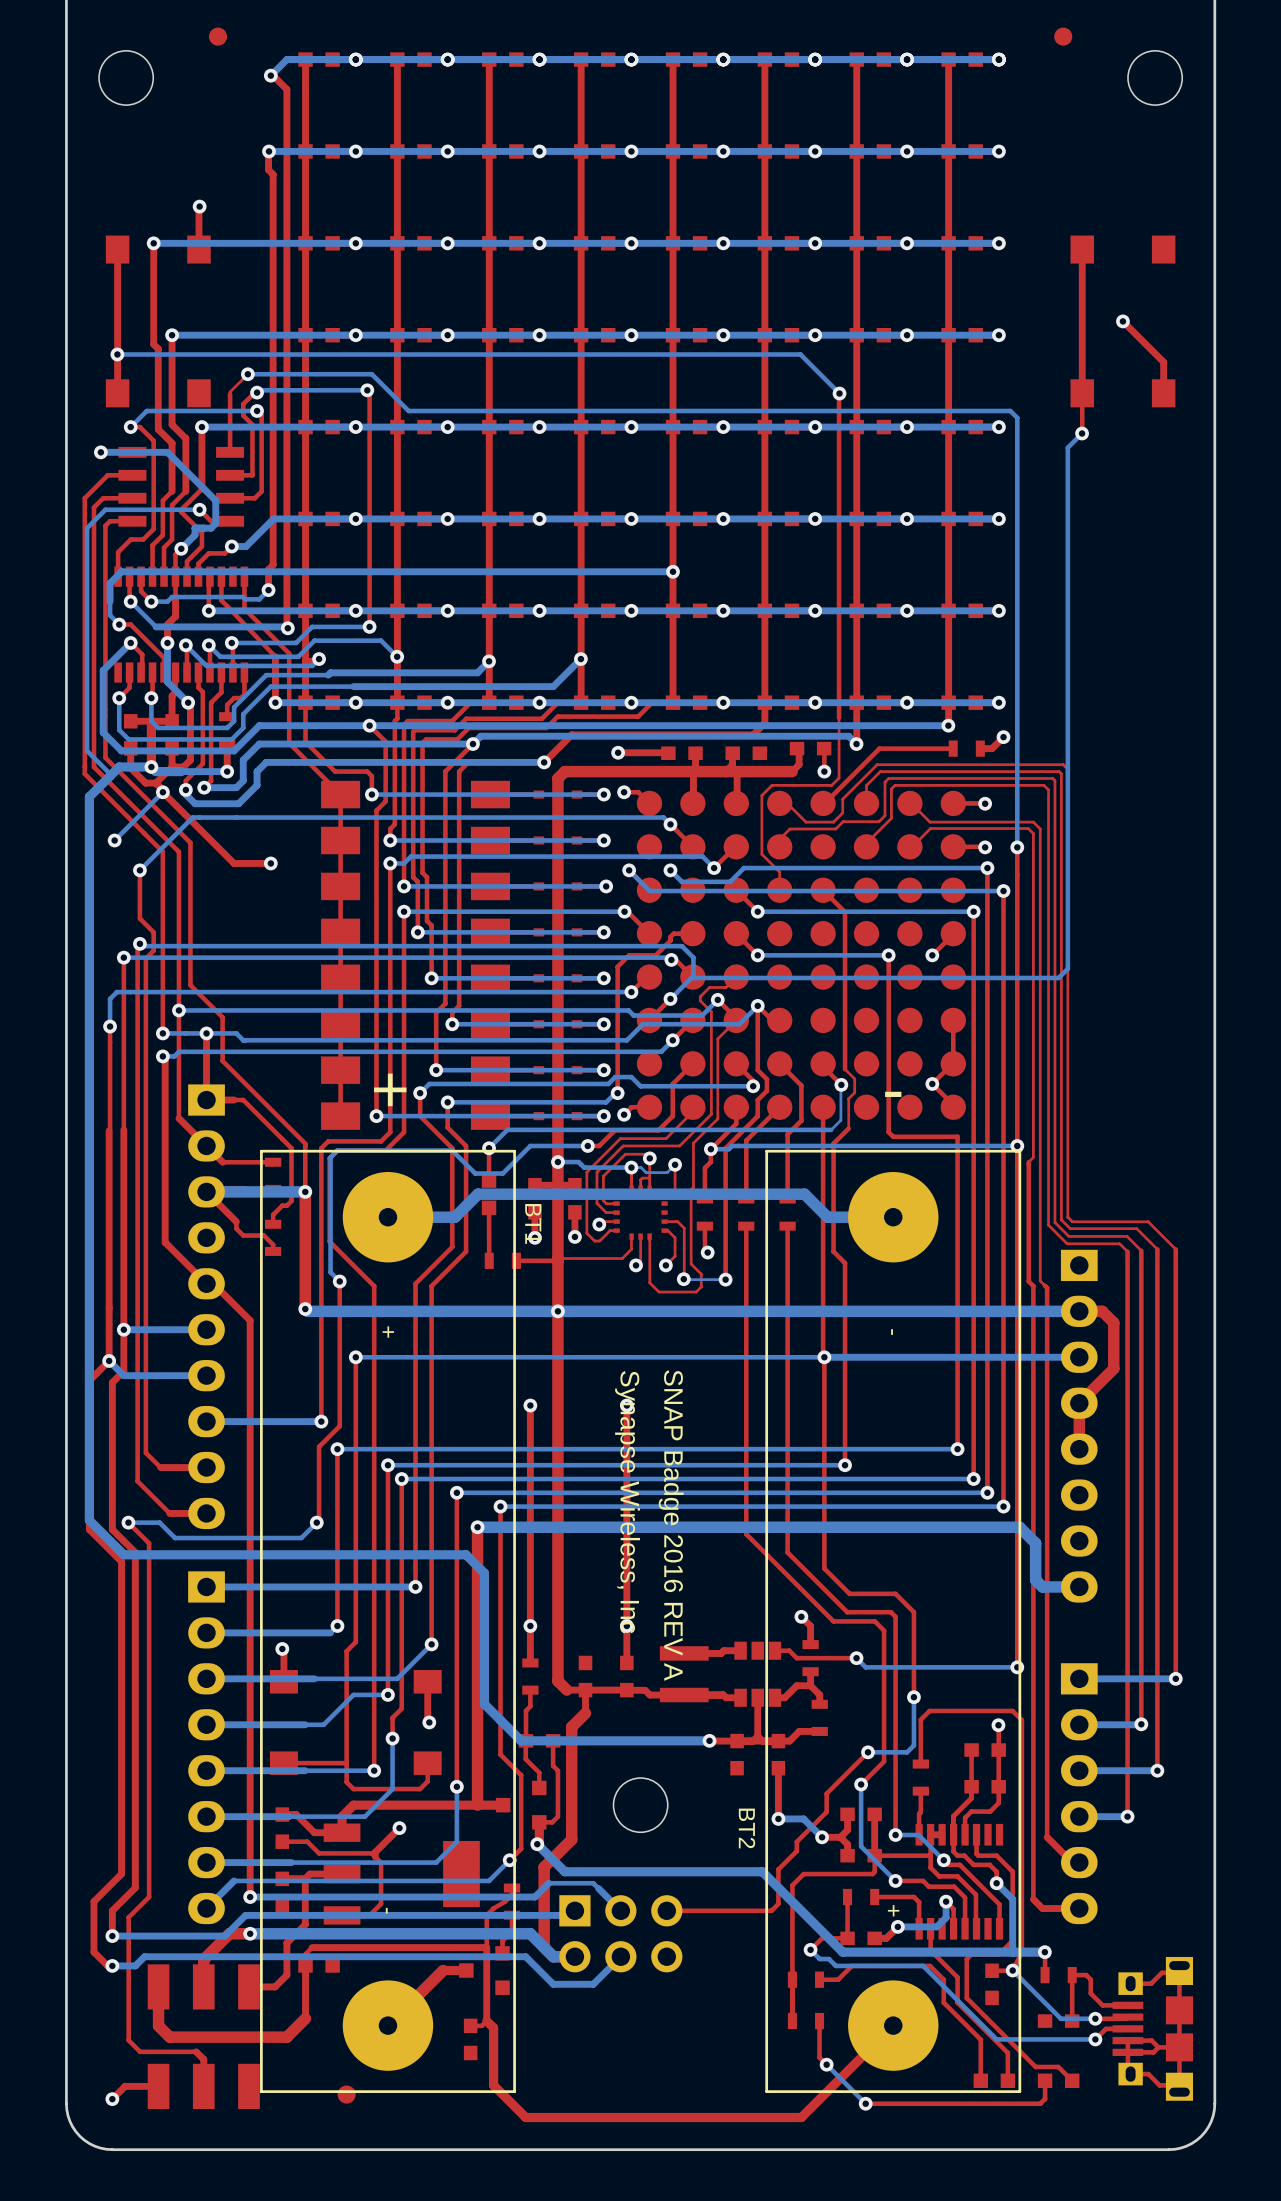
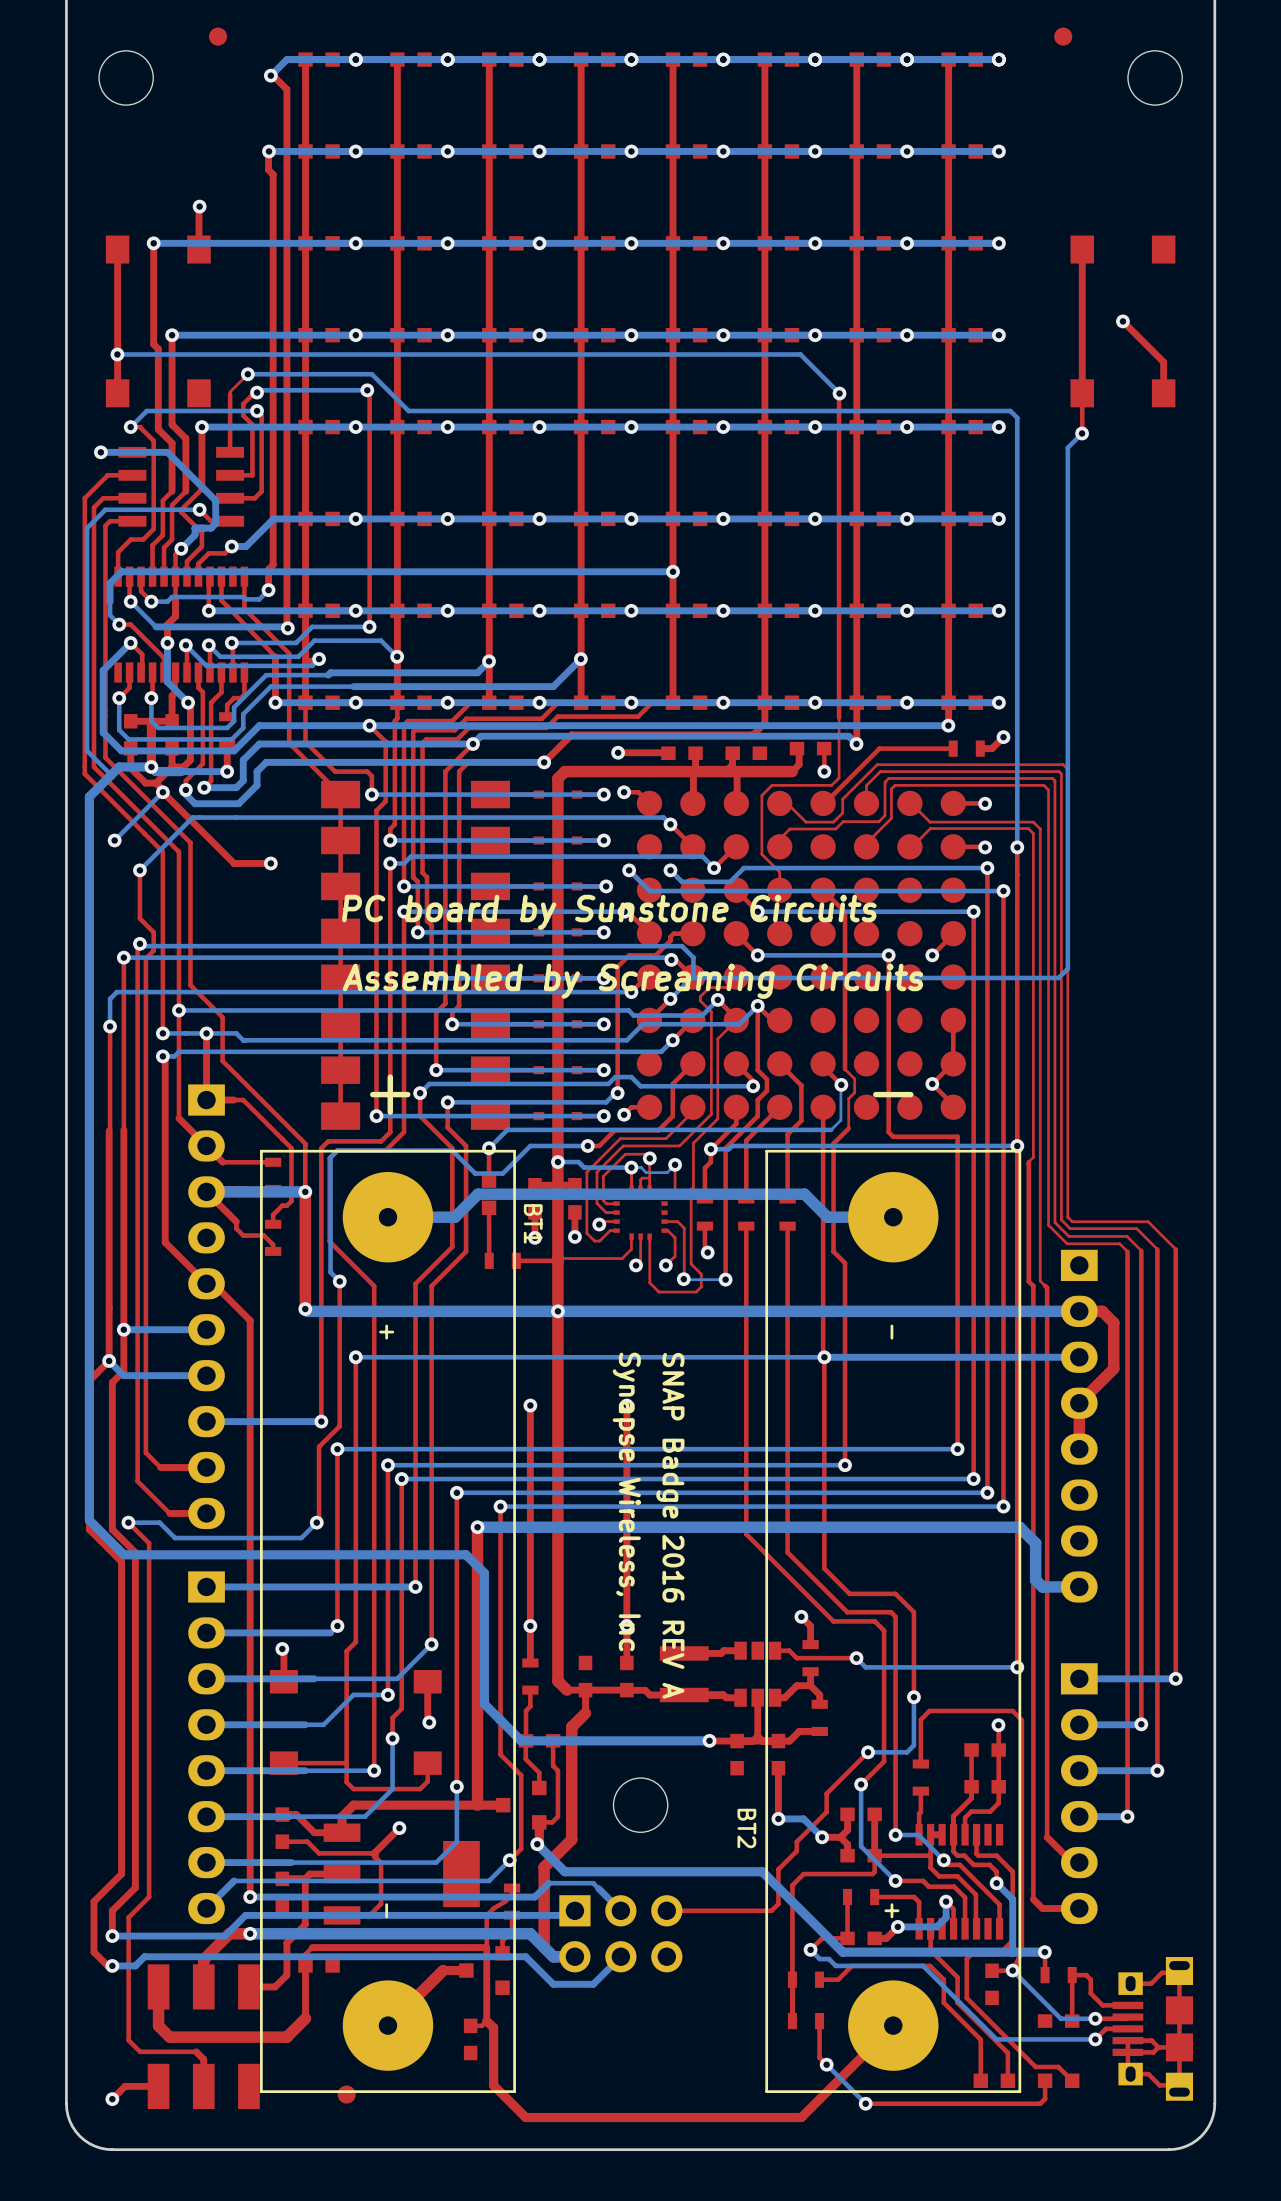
text: none -> PC board by Sunstone Circuits (609, 912)
text: none -> Assembled by Screaming Circuits (632, 981)

